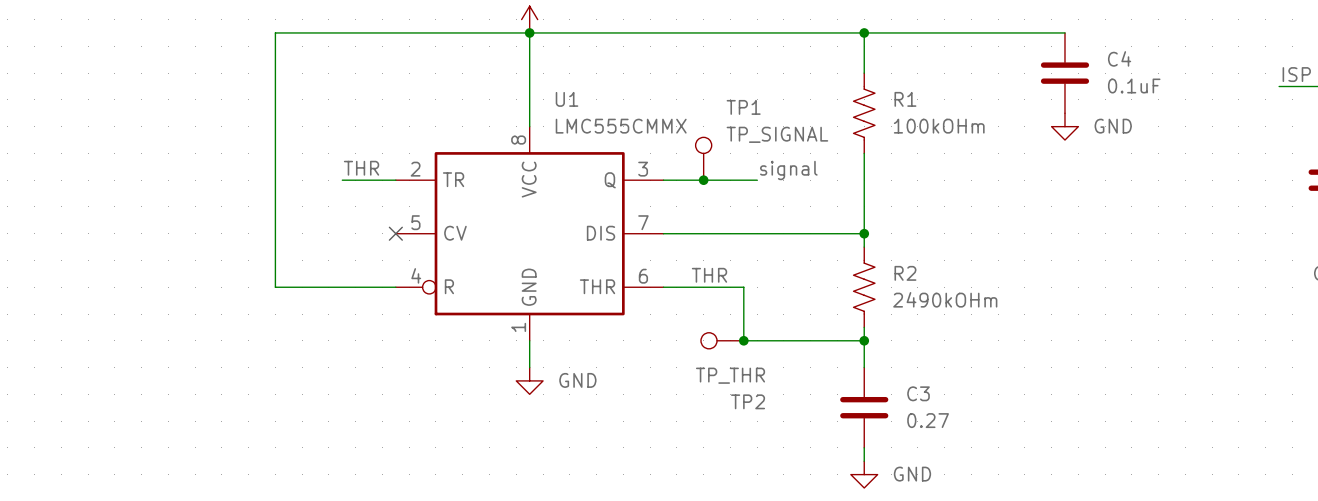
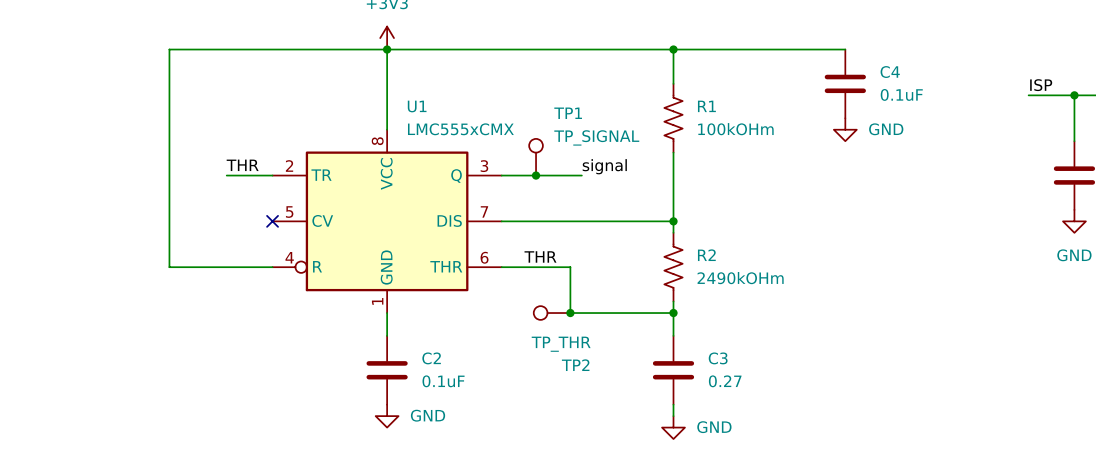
U1 value: LMC555CMMX (621, 126) -> LMC555xCMX (460, 129)
power symbol position: GND (529, 380) -> GND (387, 416)
C2: none -> 0.1uF (387, 370)

